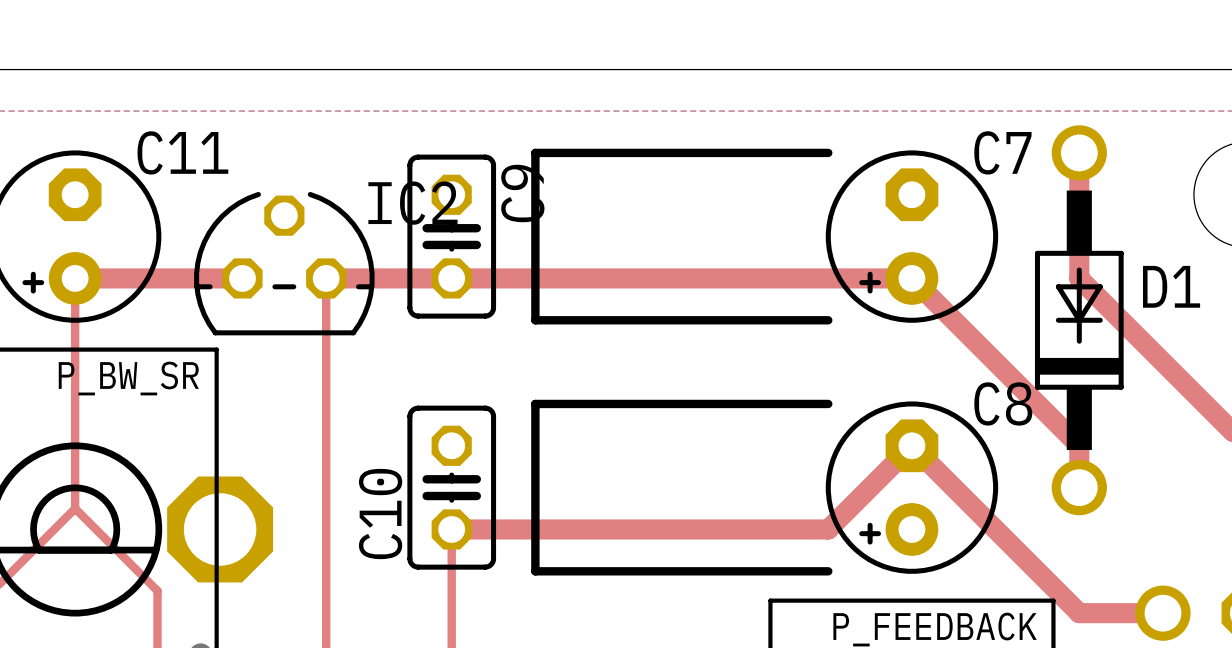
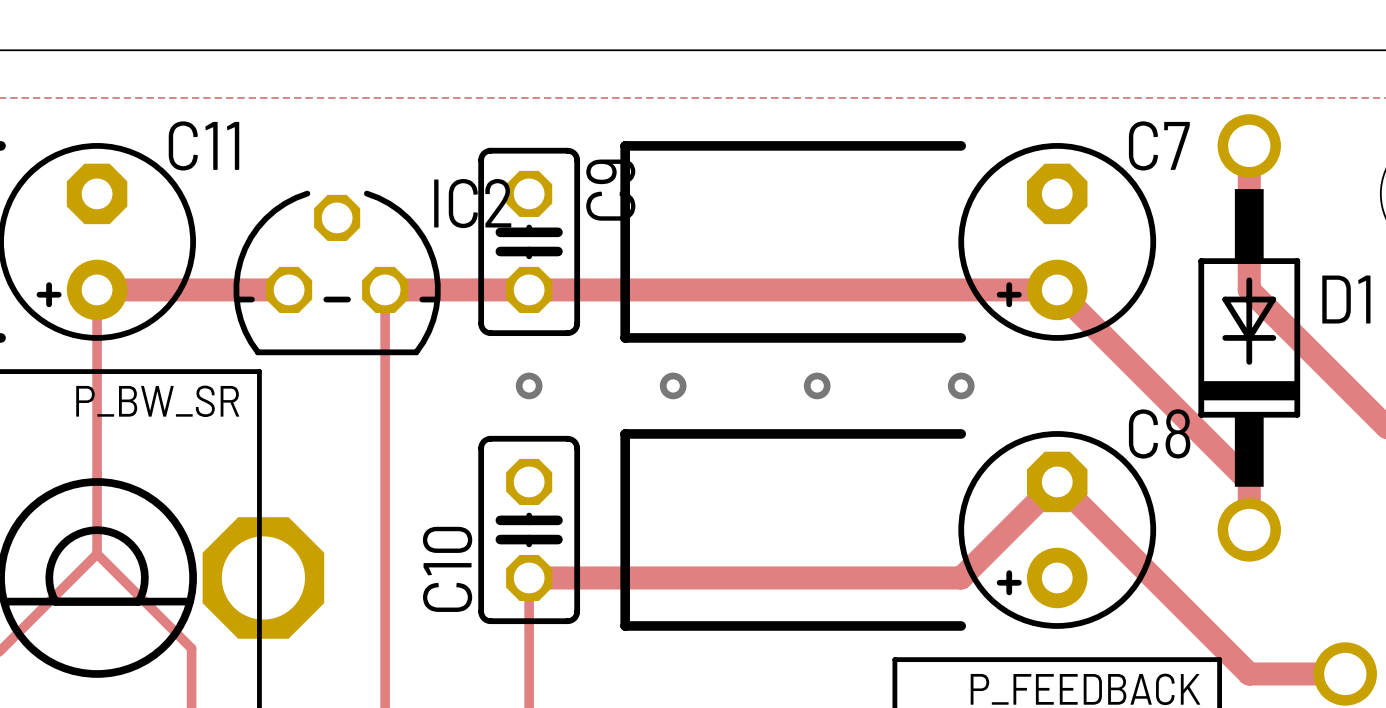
via: none -> (529, 385)
via: none -> (673, 385)
via: none -> (817, 385)
via: none -> (961, 385)

